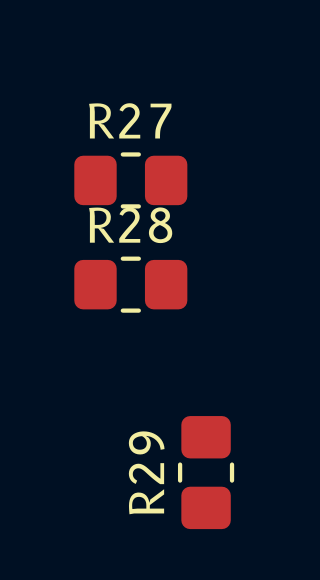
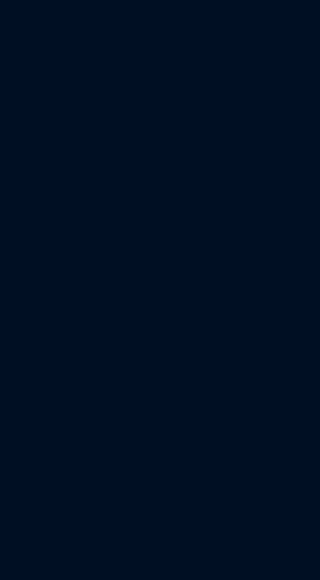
R27: (130, 180) -> none
R28: (130, 284) -> none
R29: (206, 472) -> none

